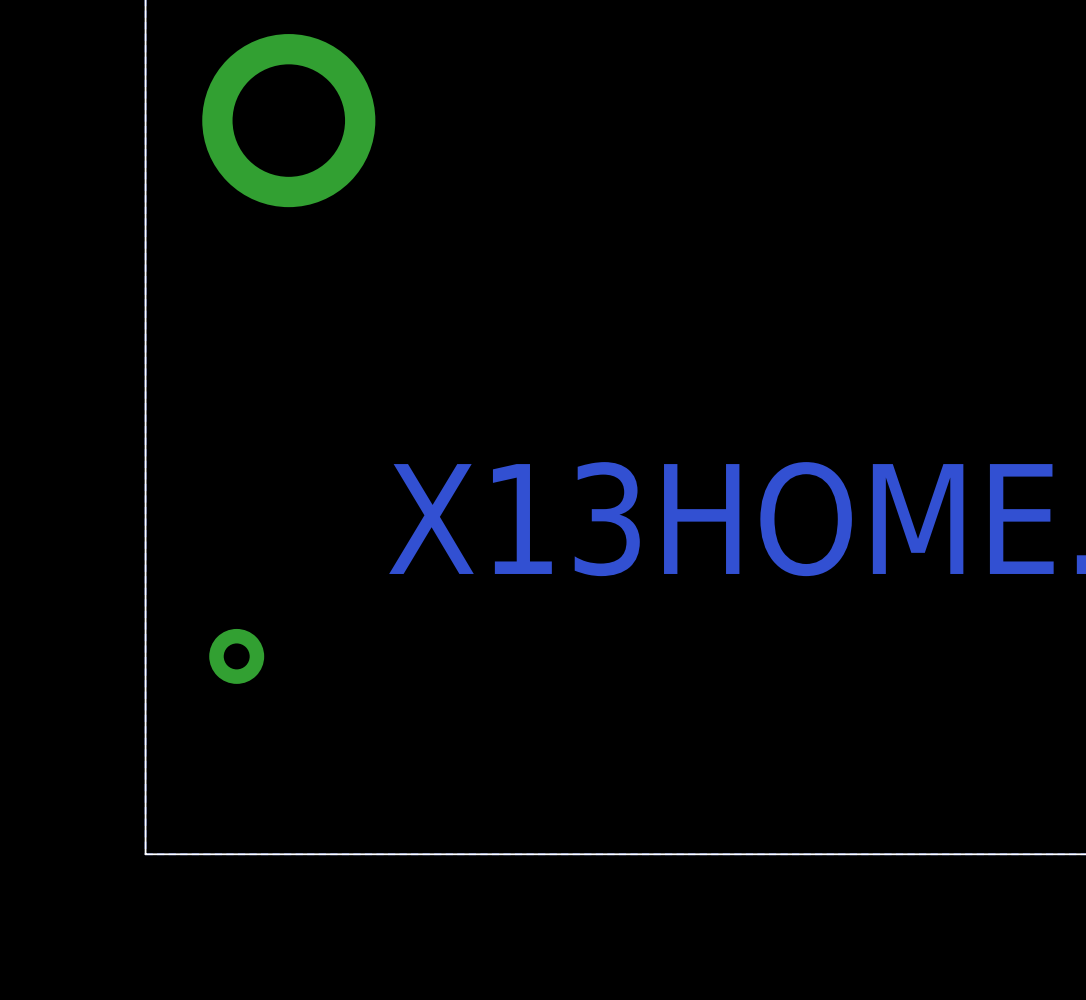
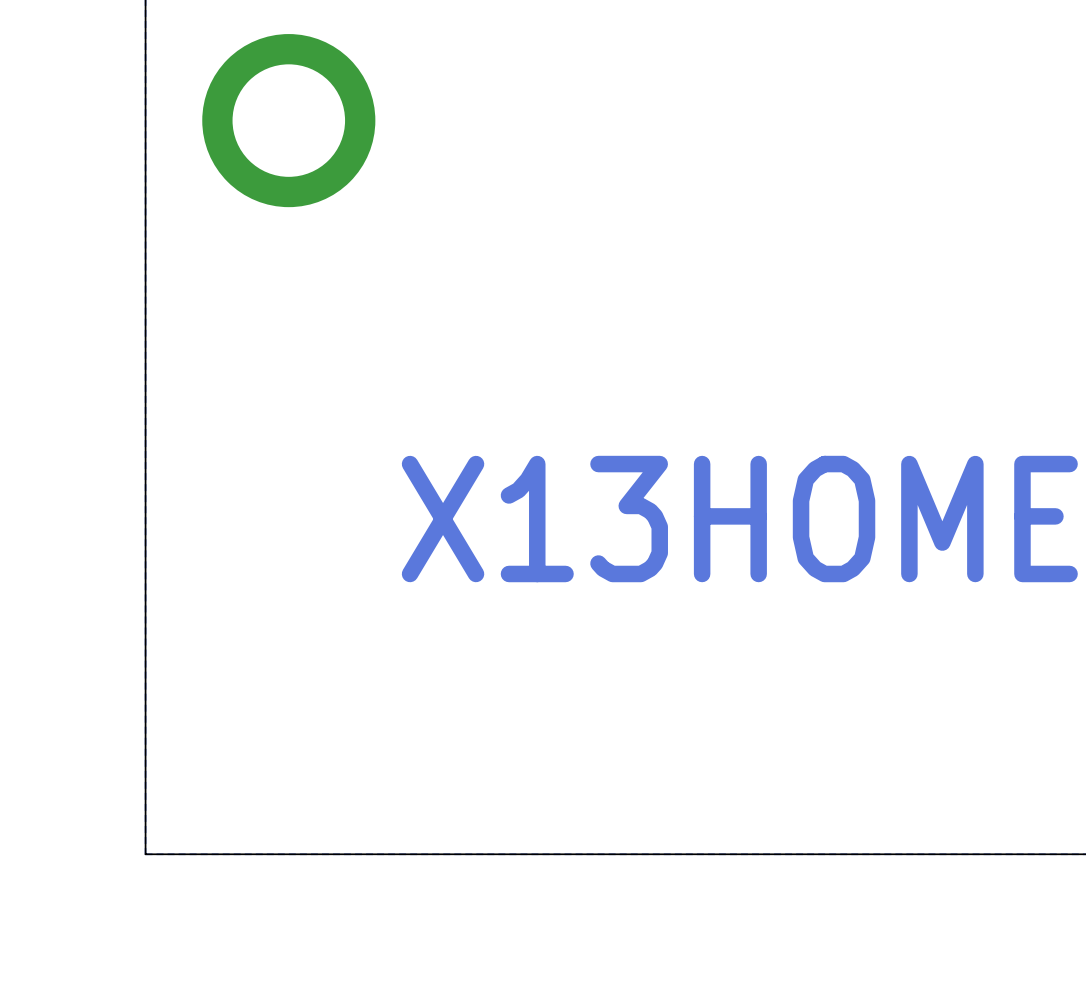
via: (236, 656) -> none

